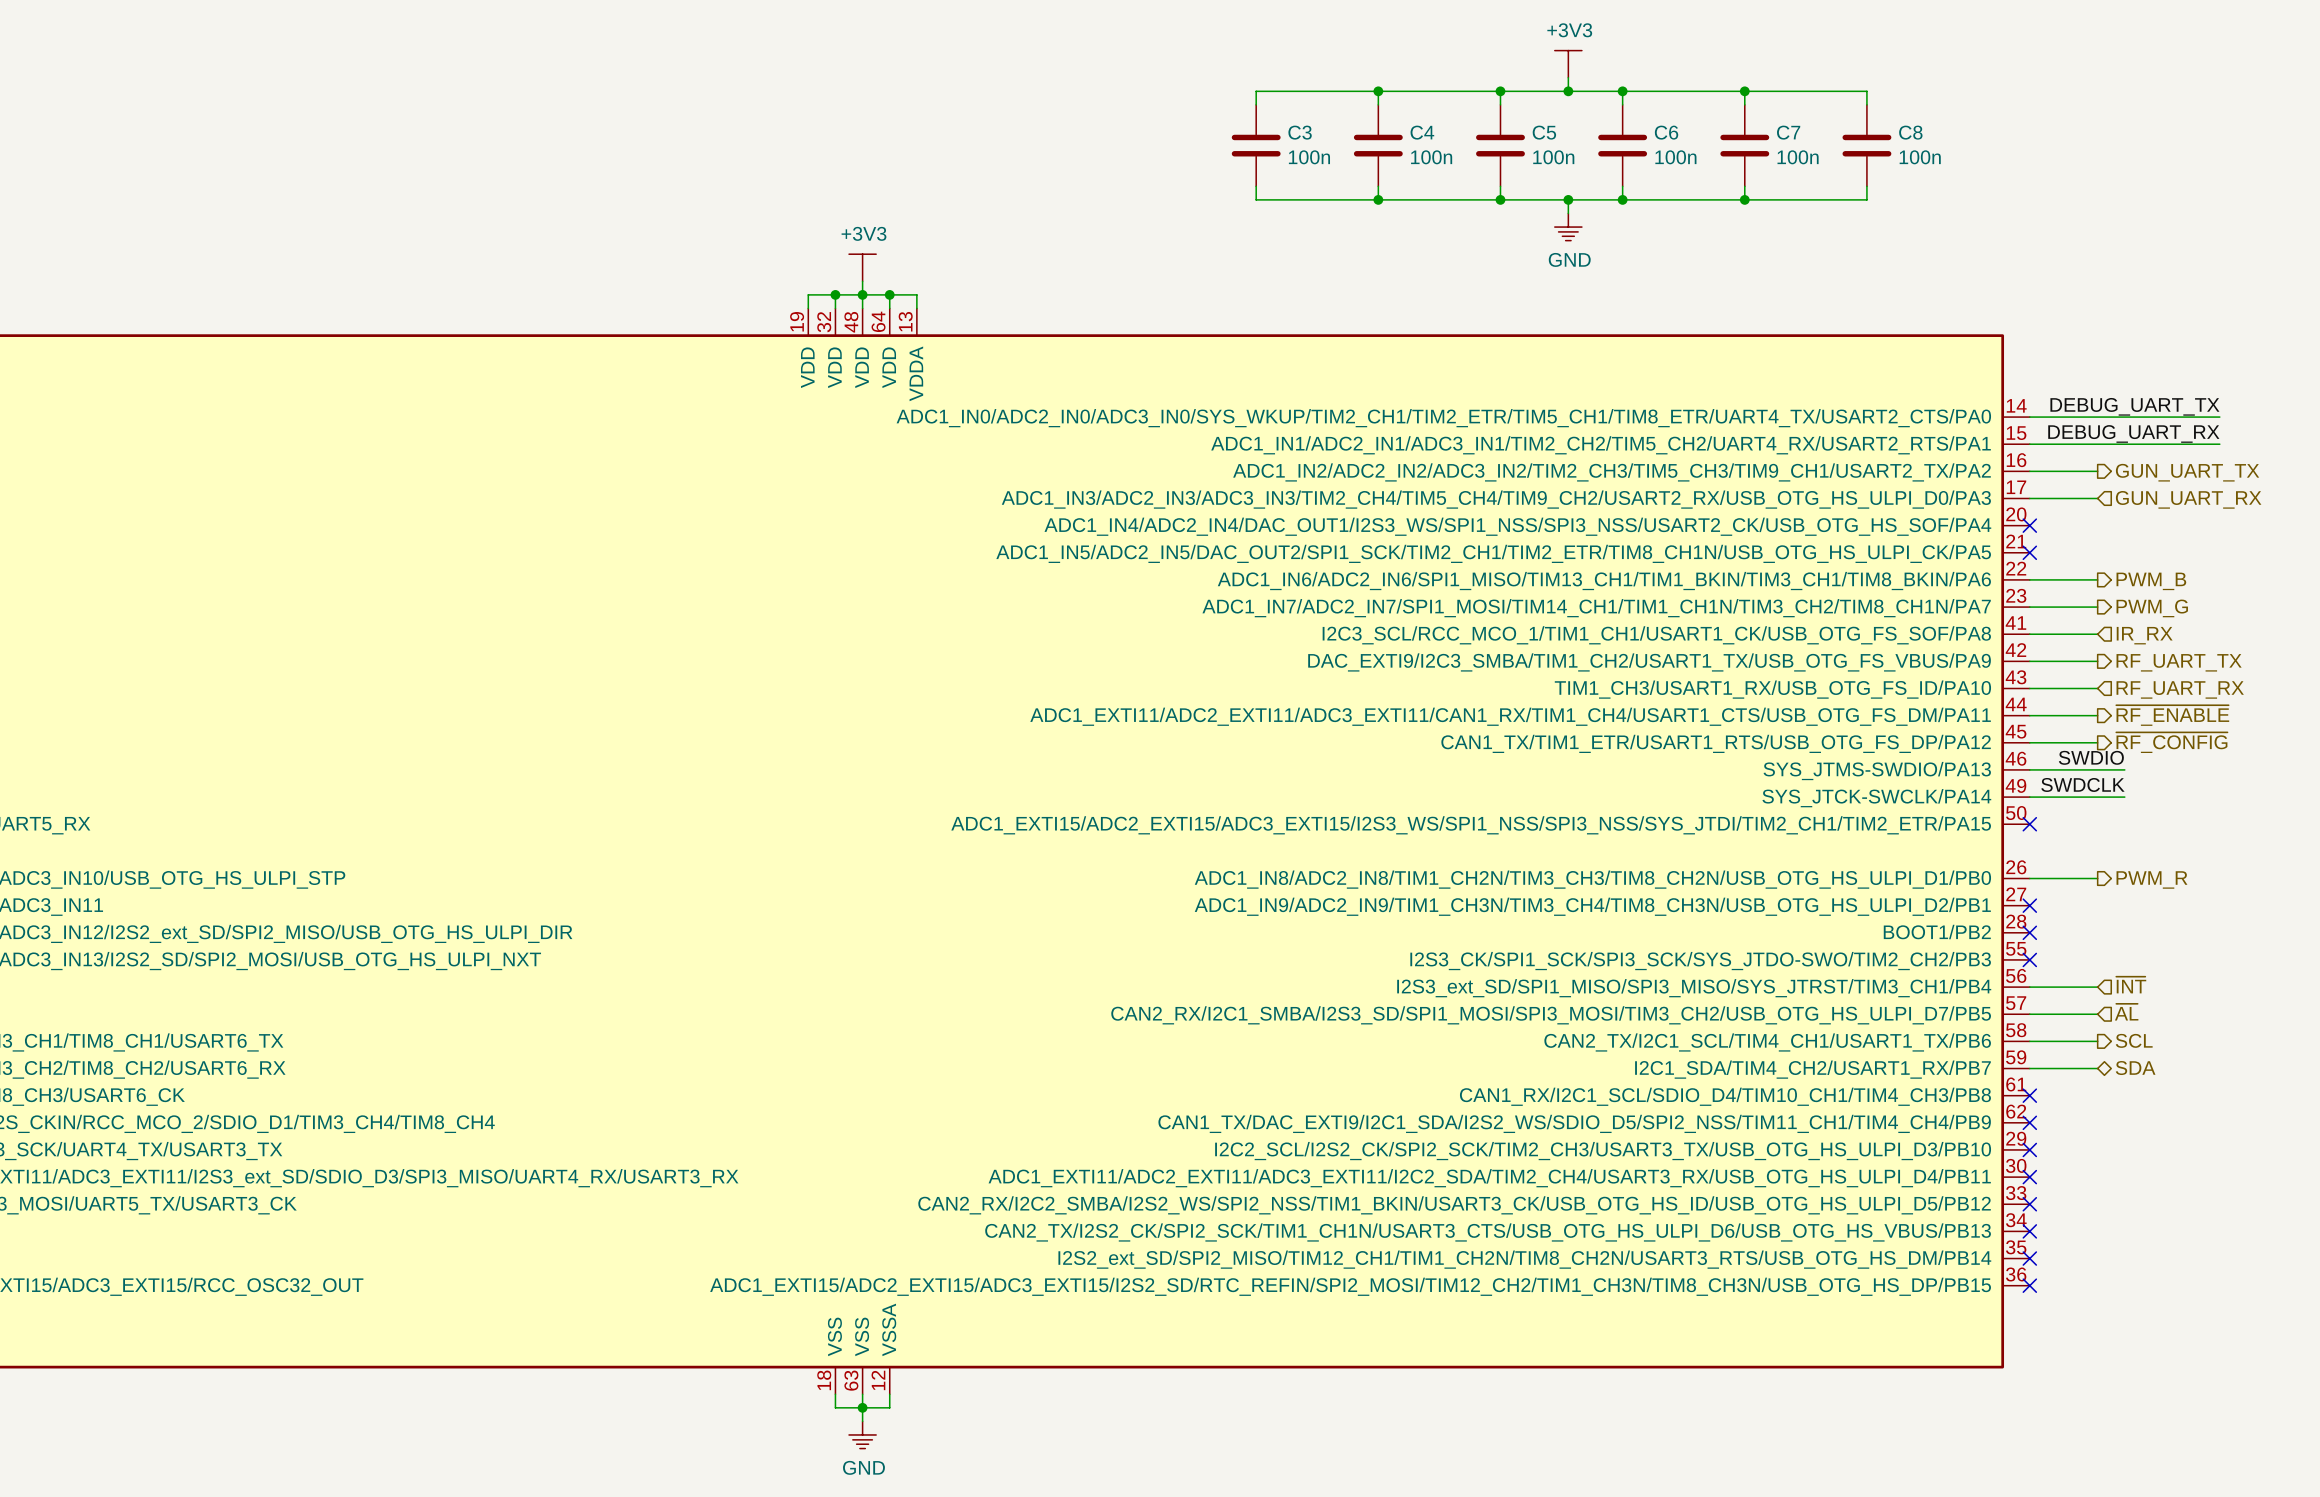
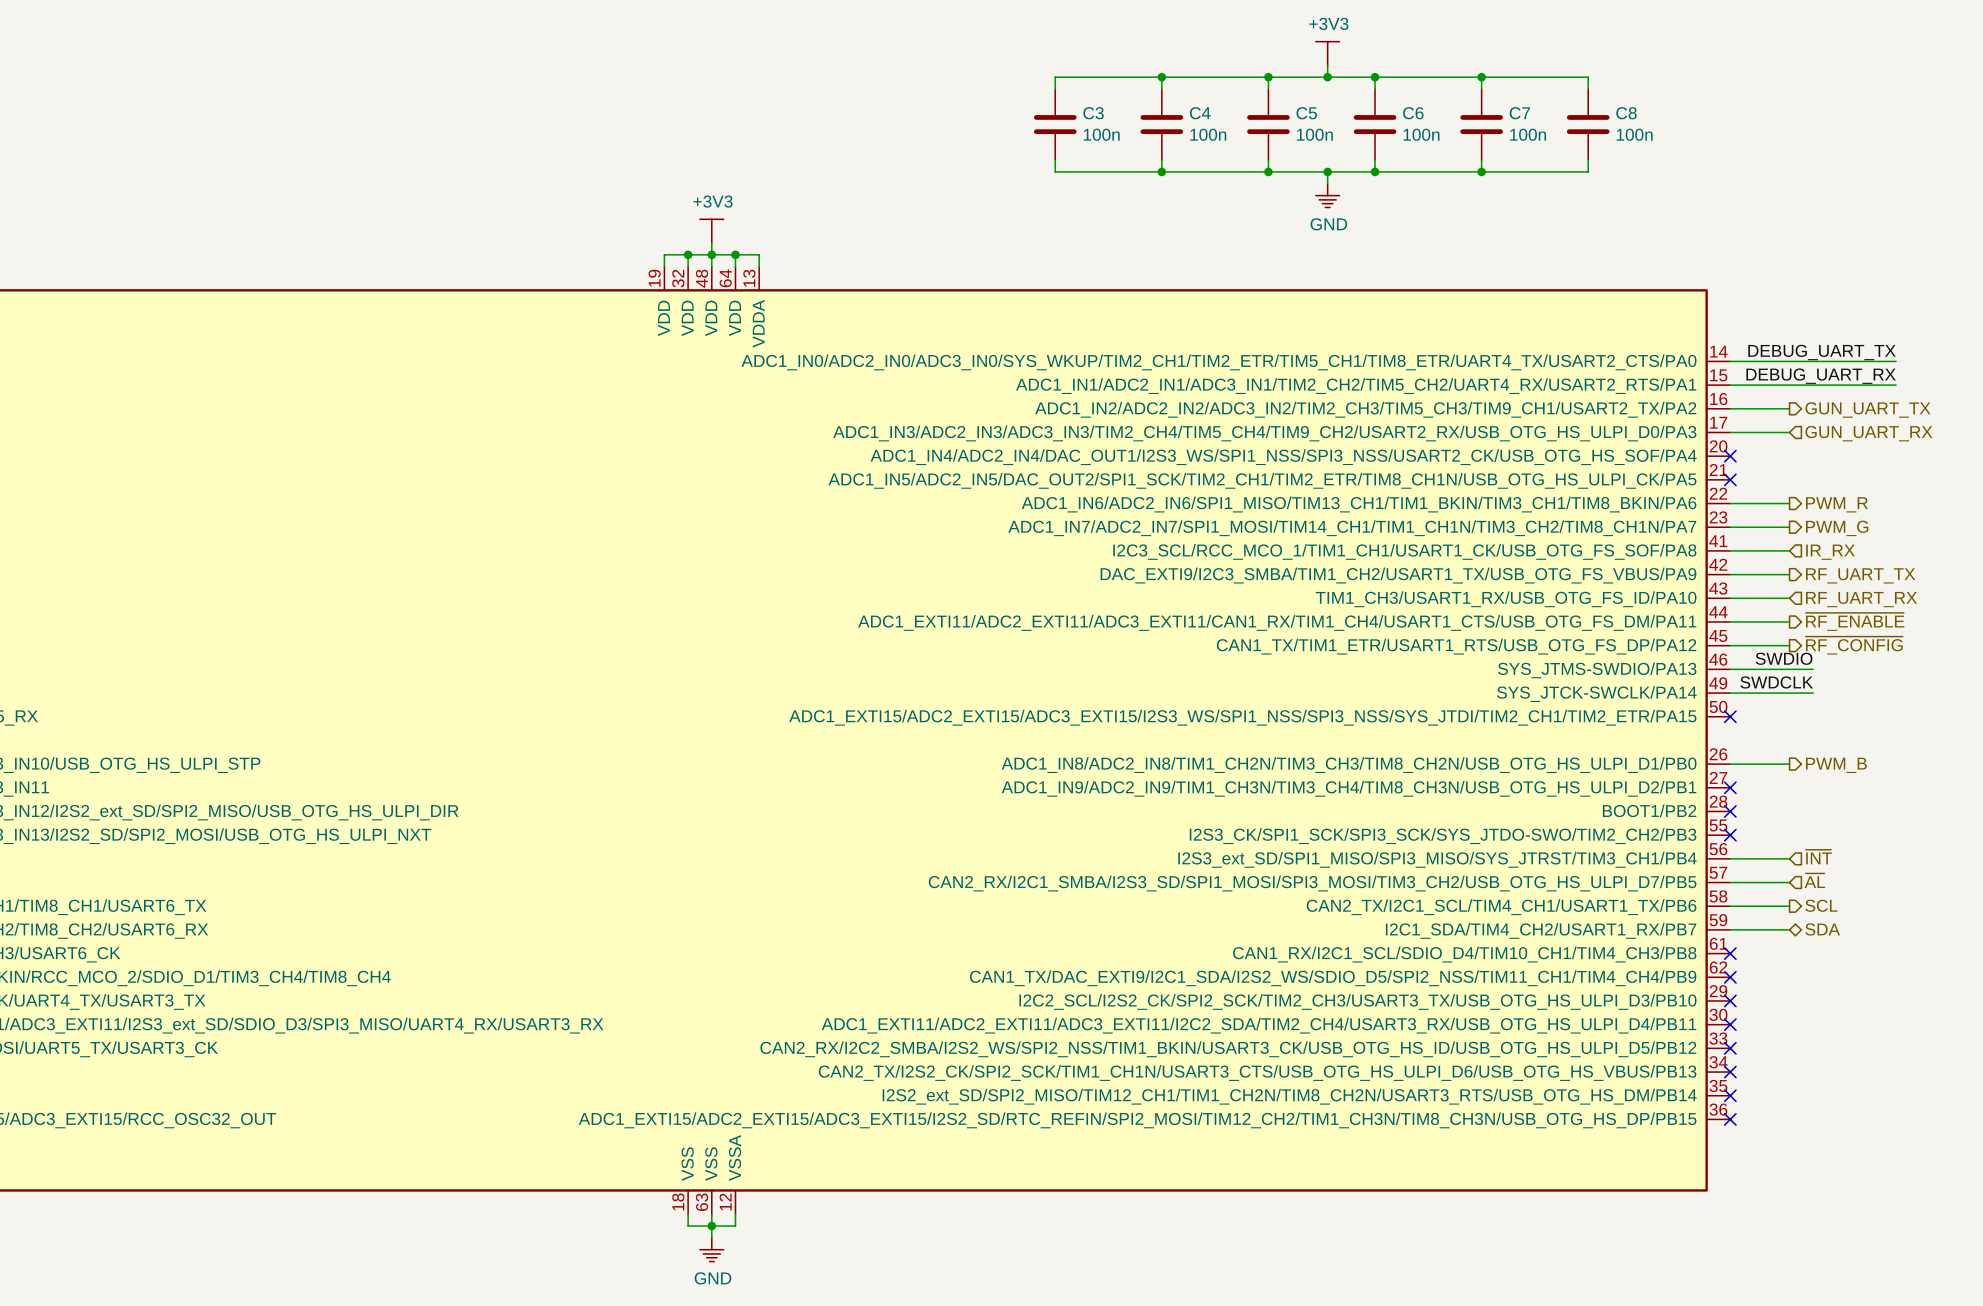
hierarchical label: PWM_B (2151, 581) -> PWM_R (1836, 504)
hierarchical label: PWM_R (2151, 879) -> PWM_B (1836, 765)

